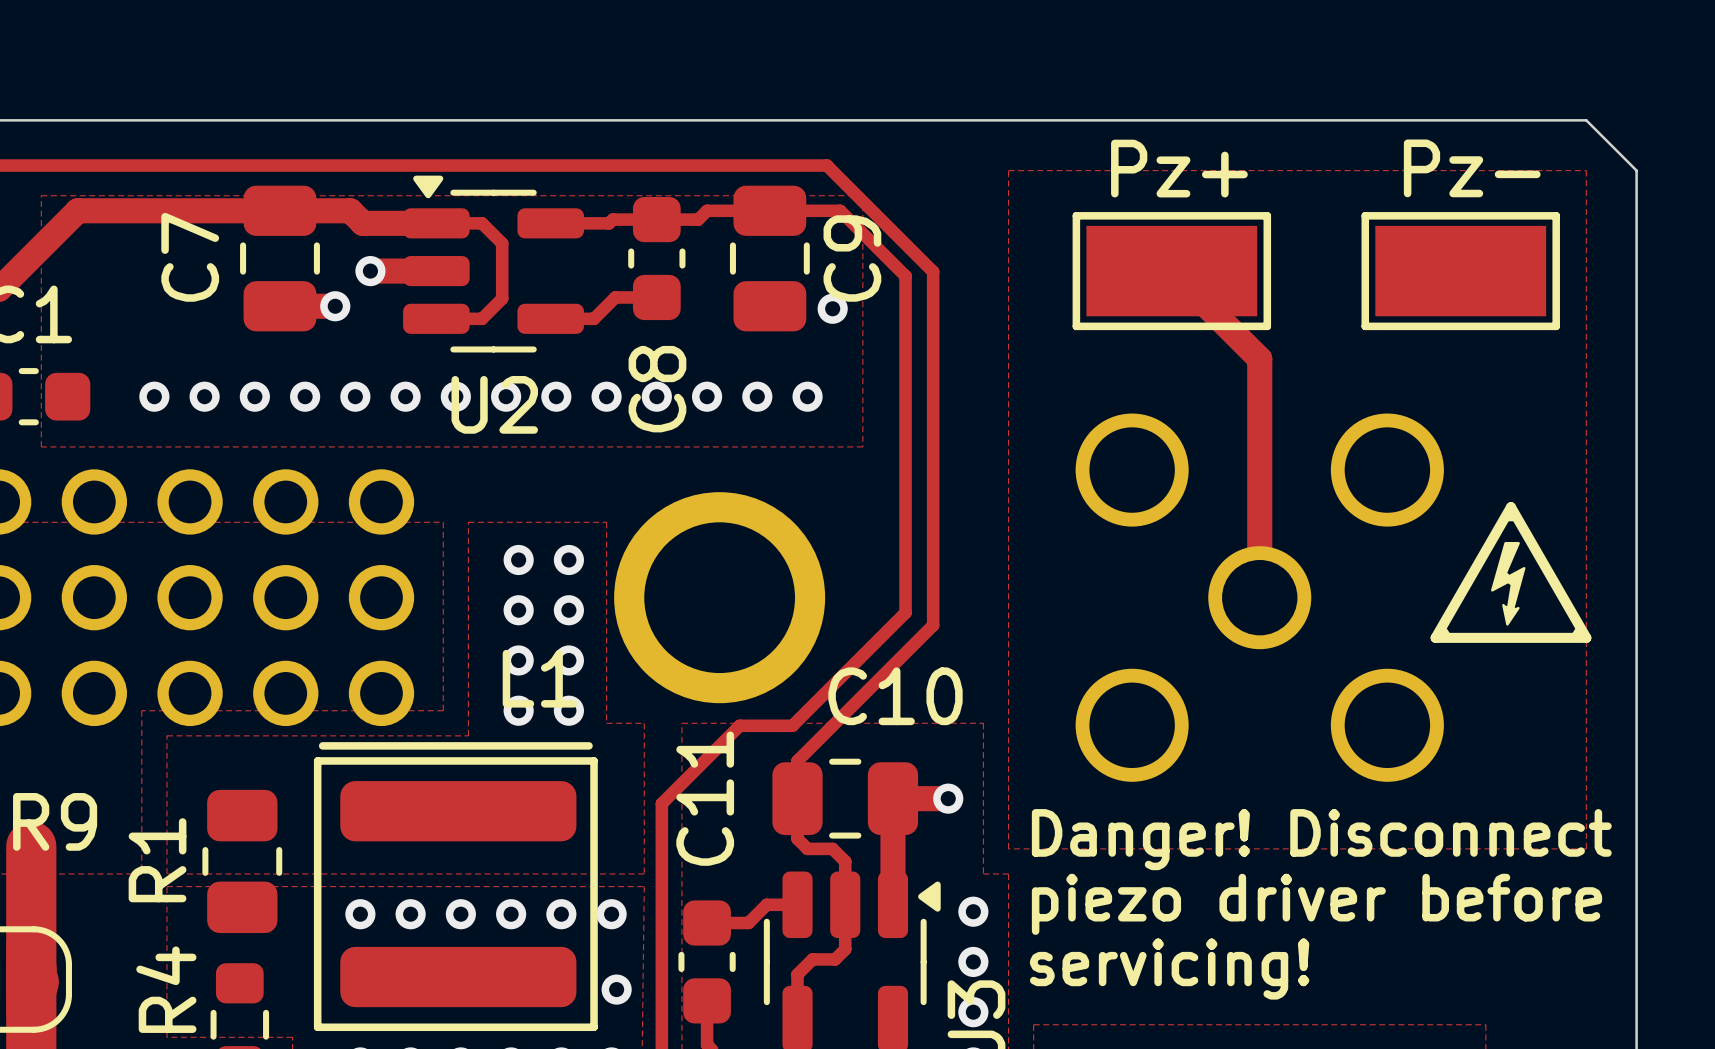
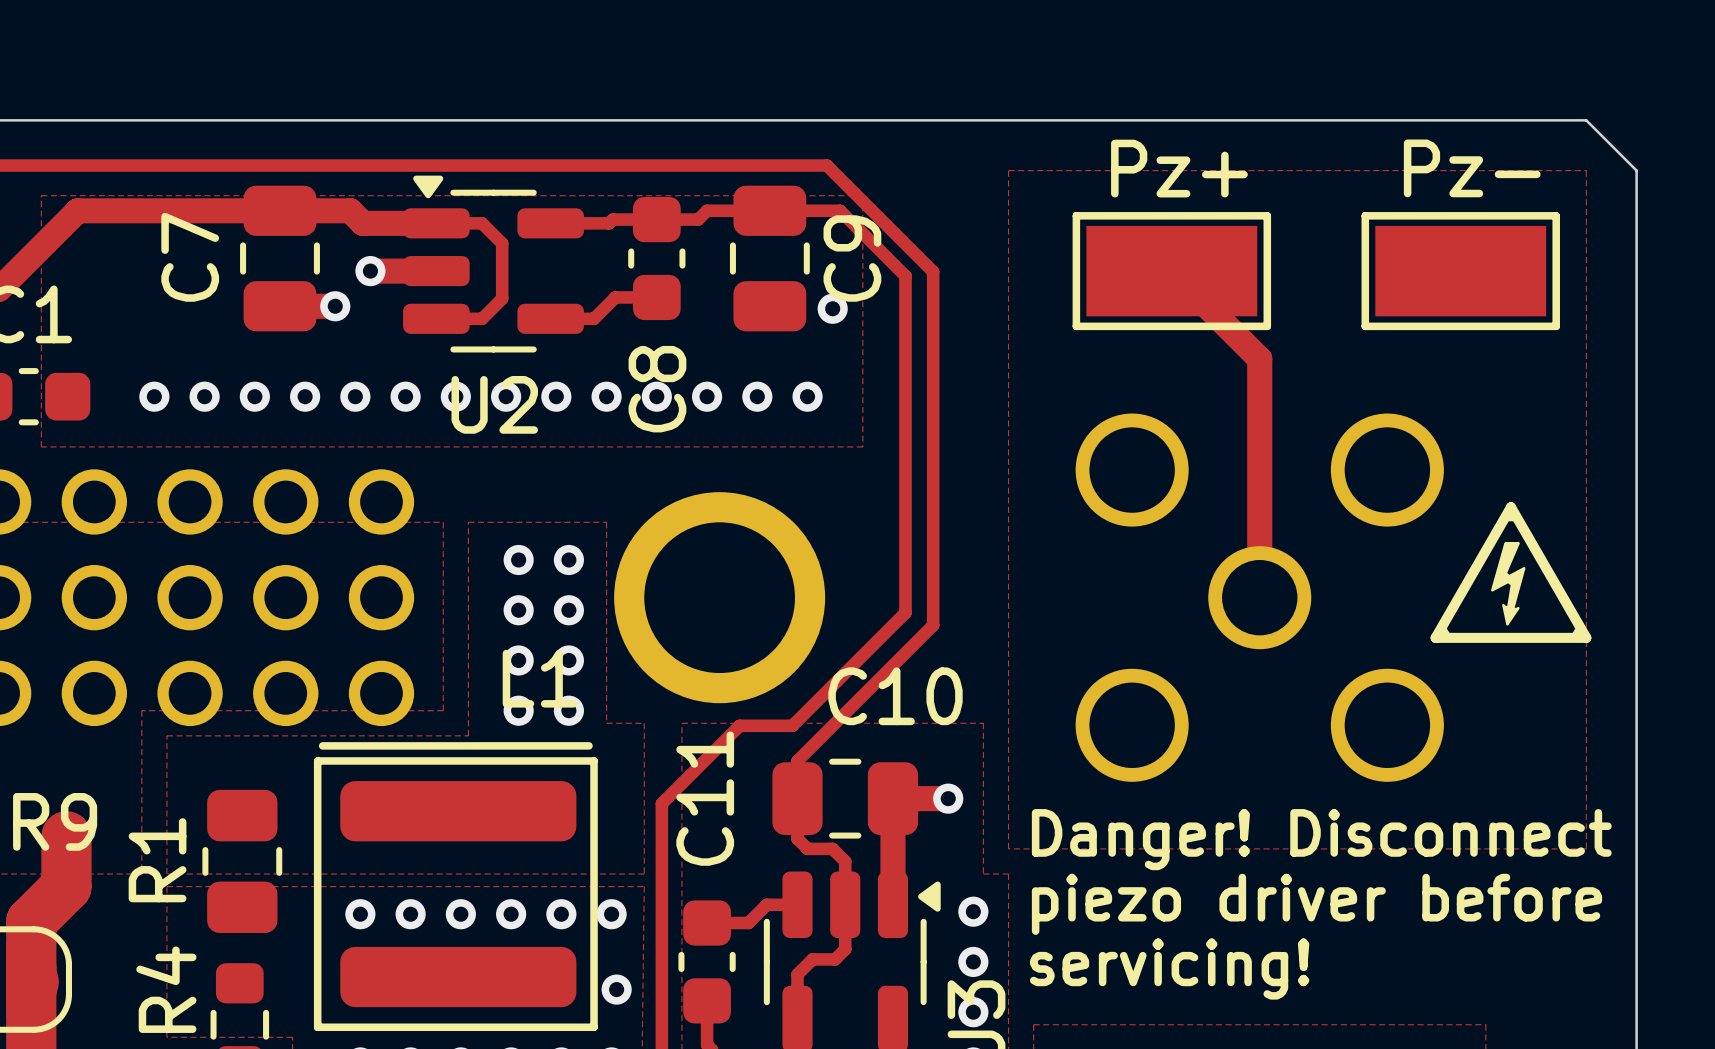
track: (31, 846) (31, 921) -> (66, 836) (66, 886) (31, 921)

